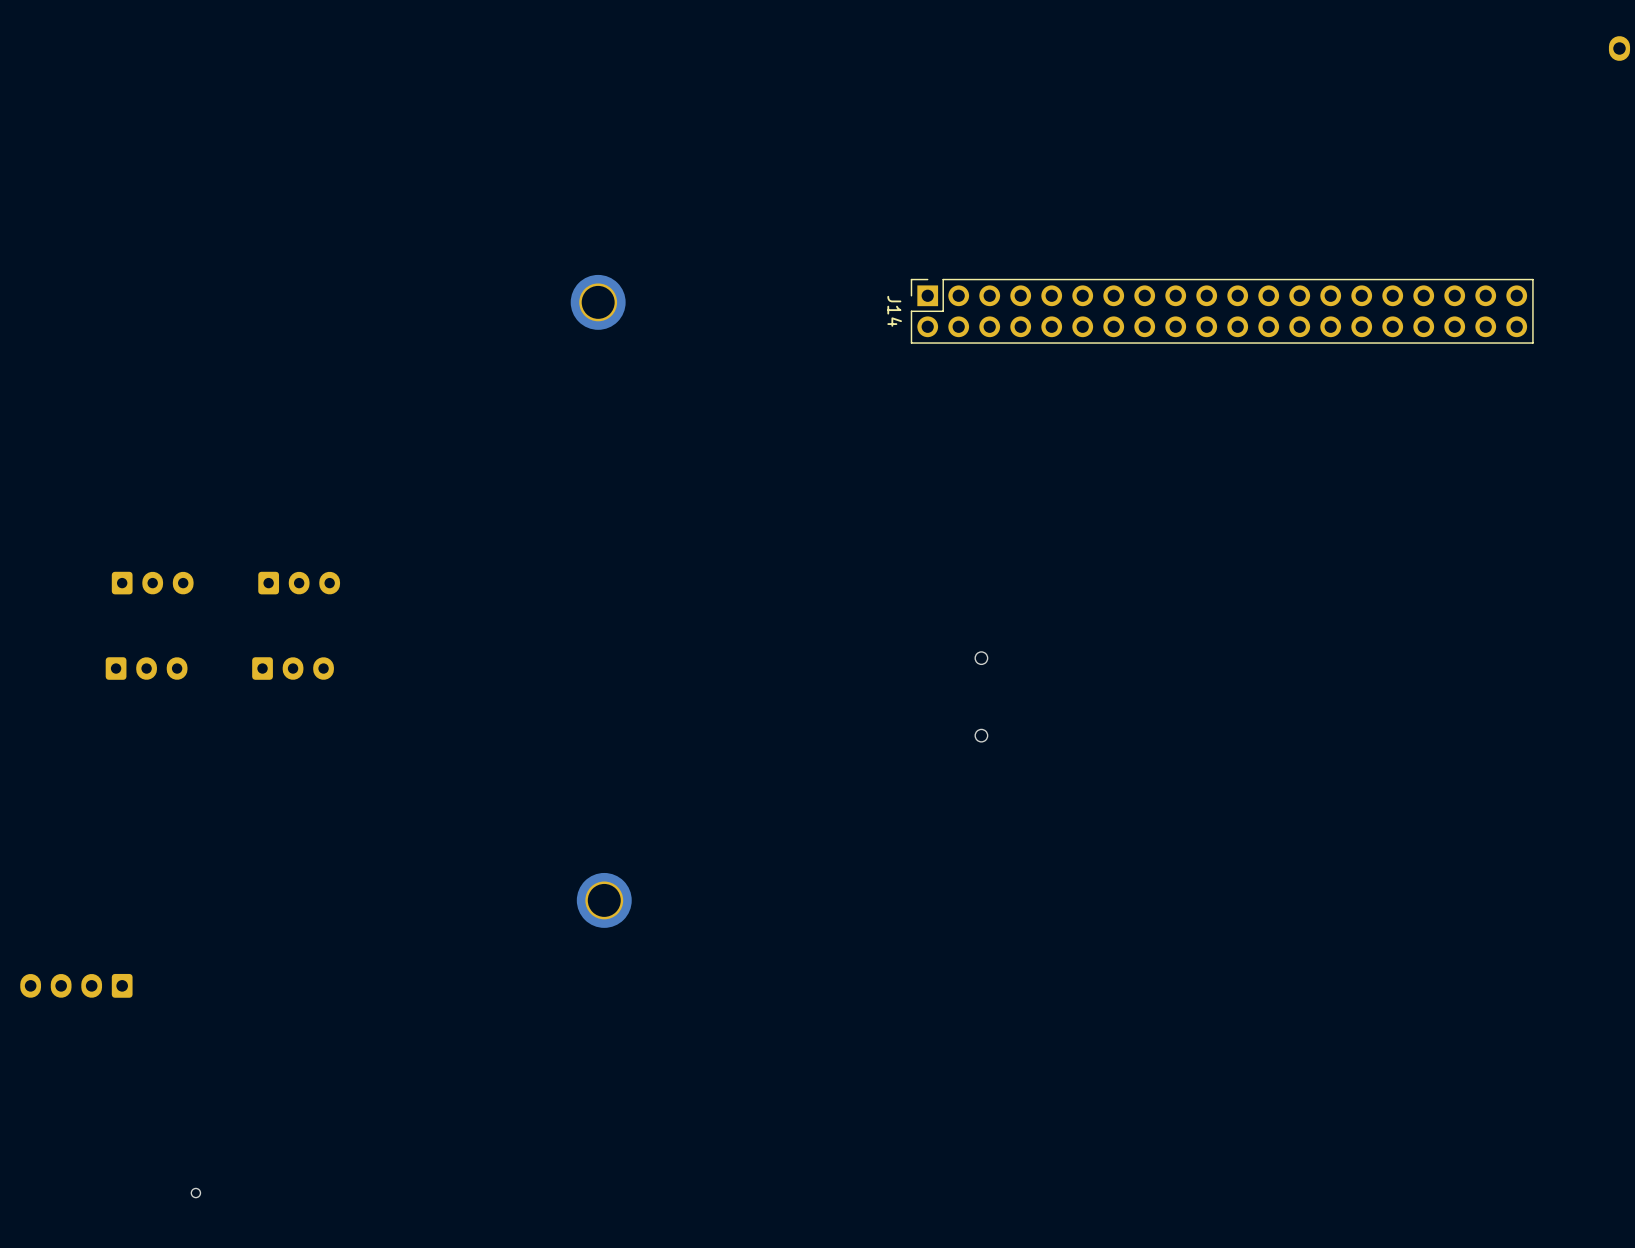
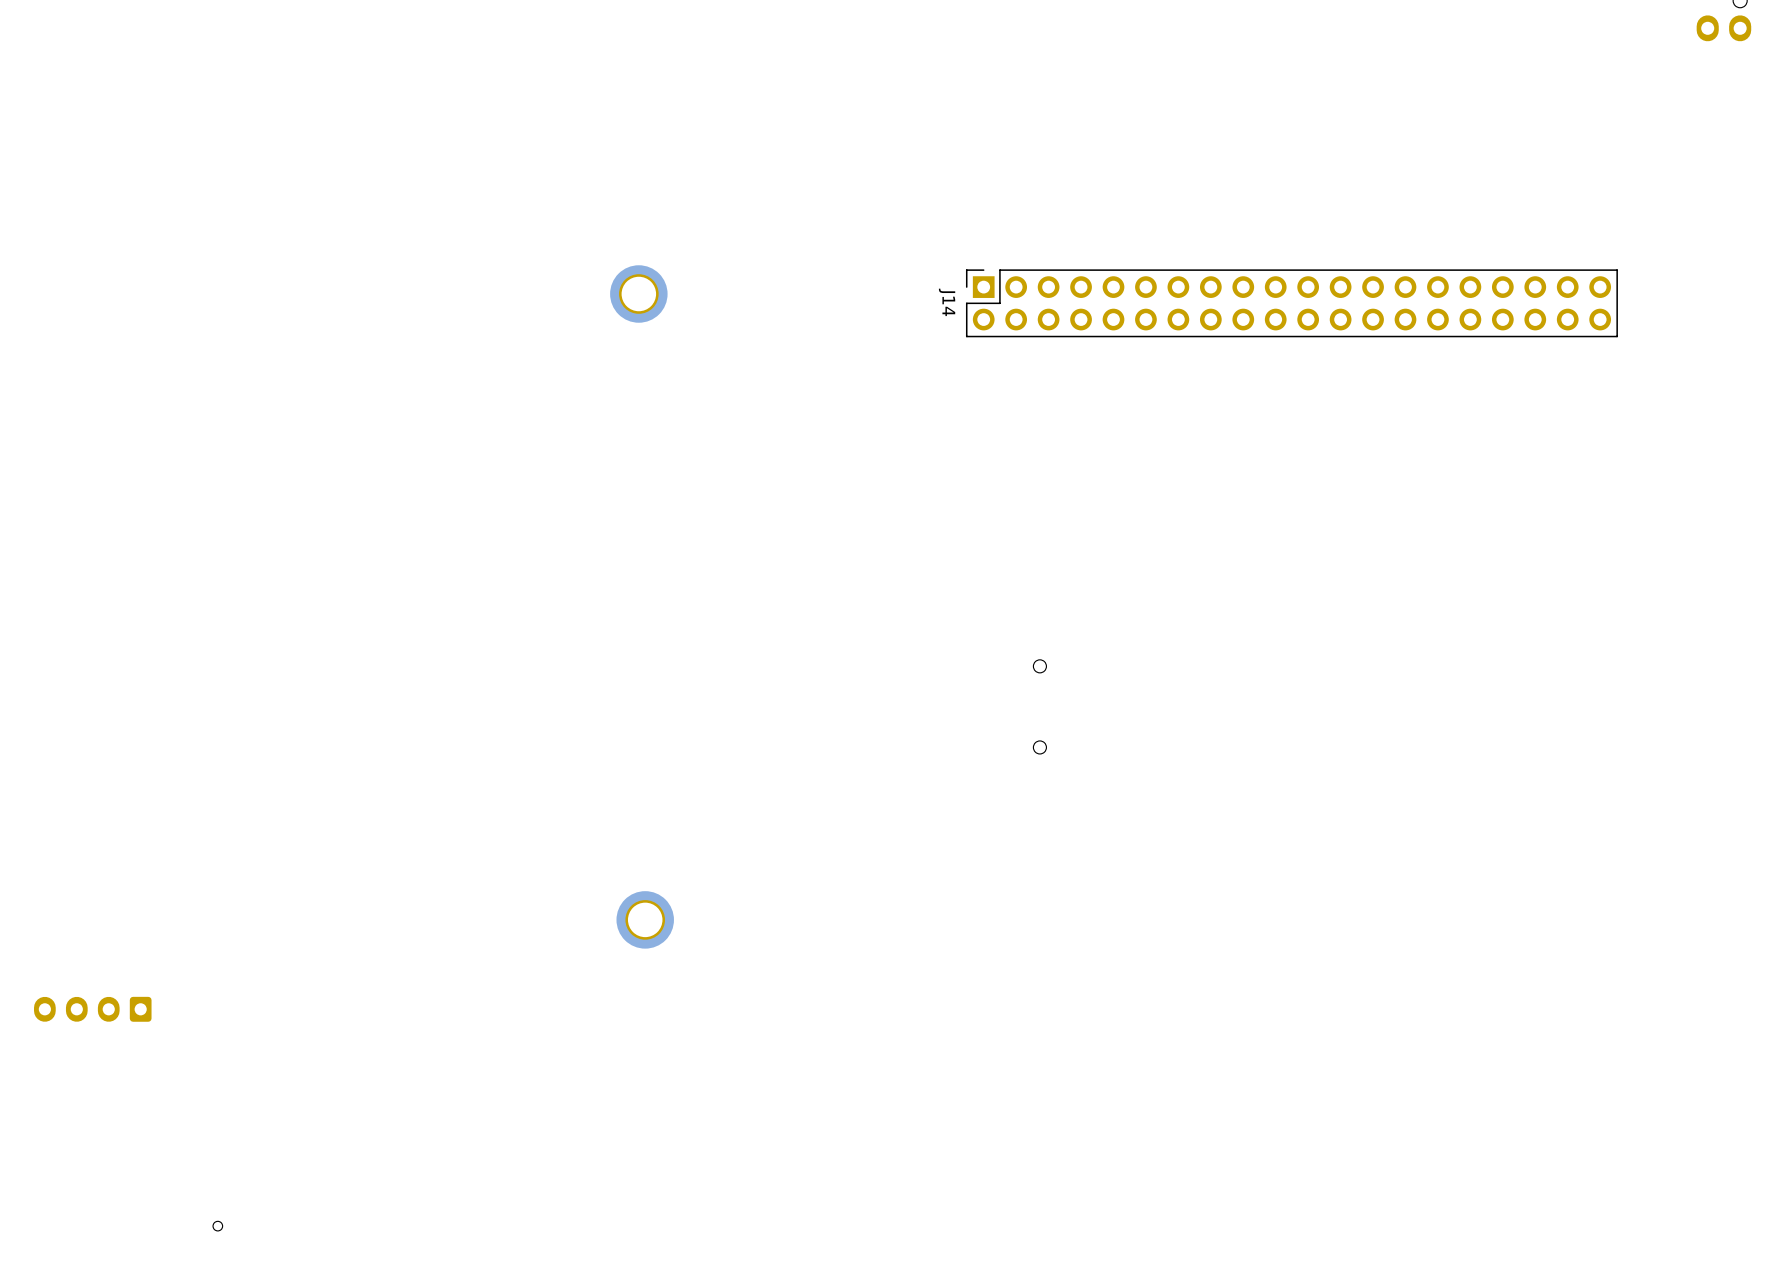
part: (152, 583) -> none
part: (299, 583) -> none
part: (146, 668) -> none
part: (293, 668) -> none

